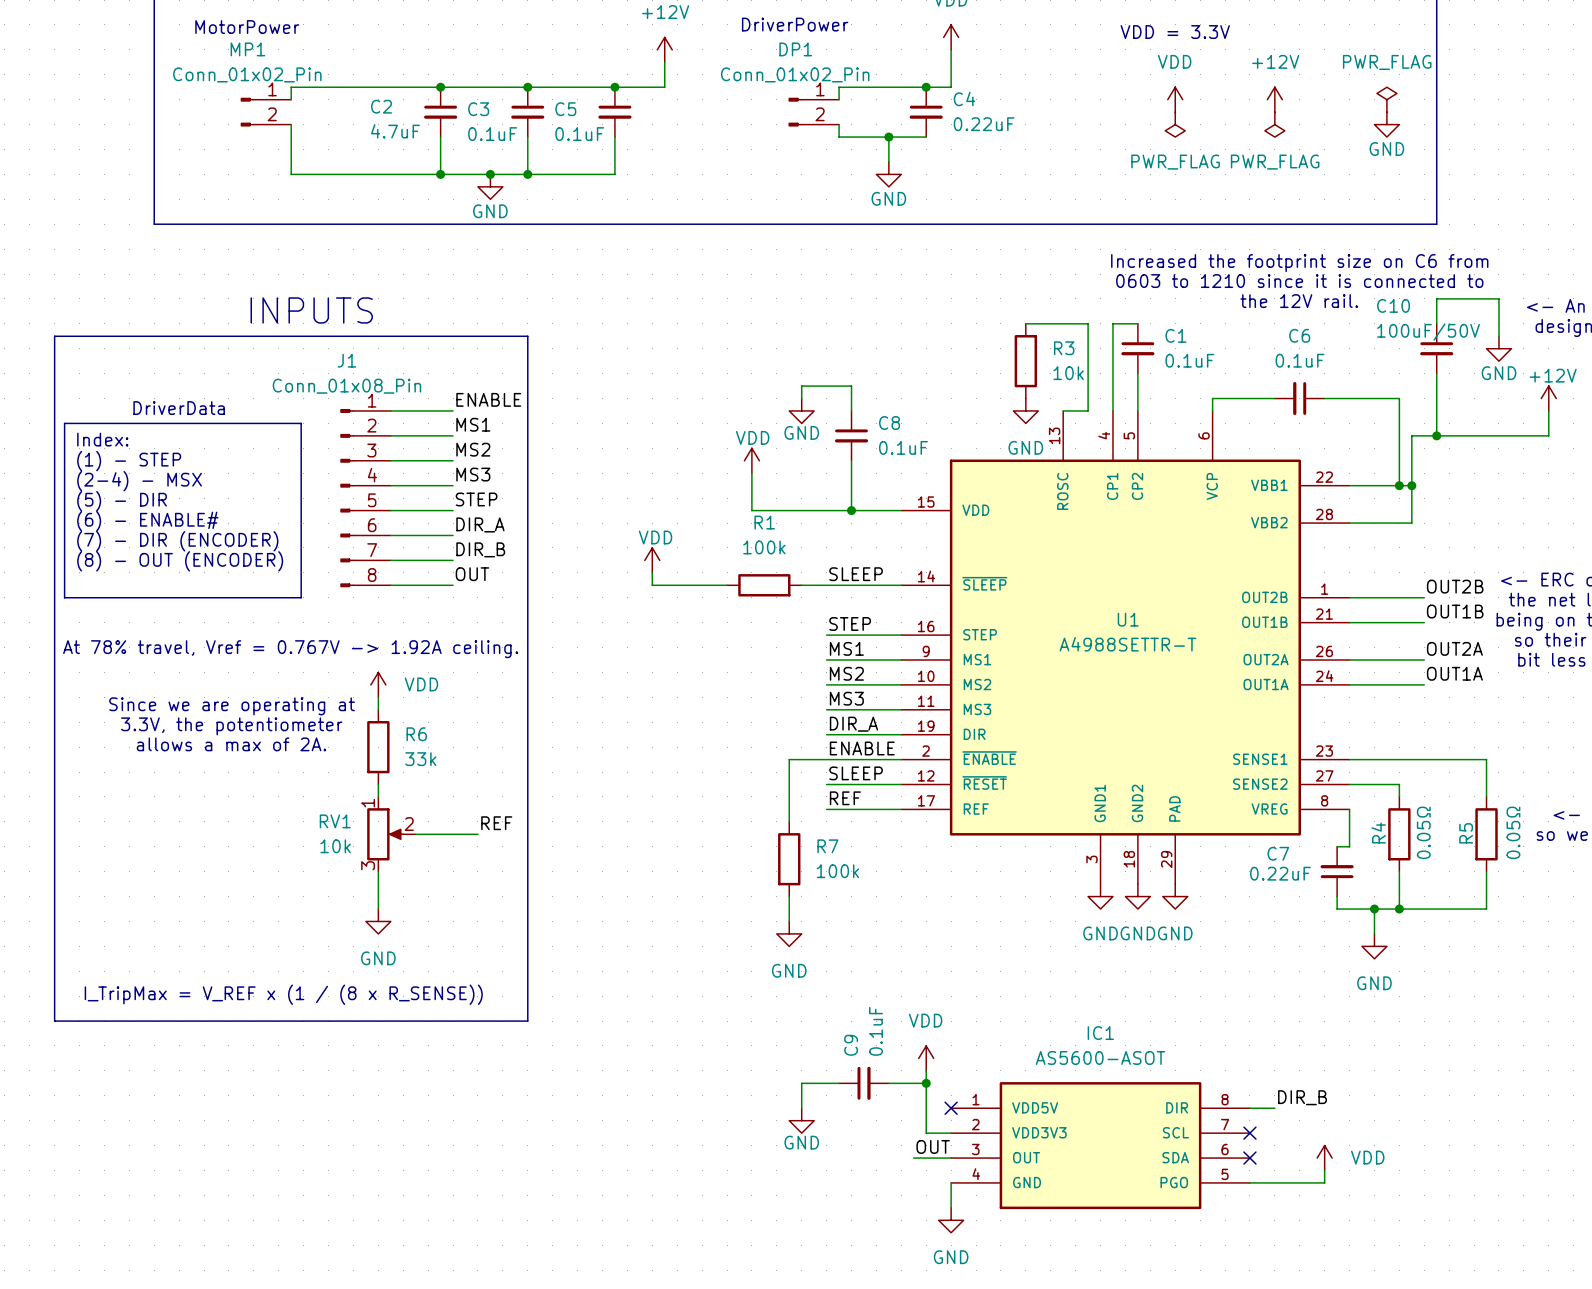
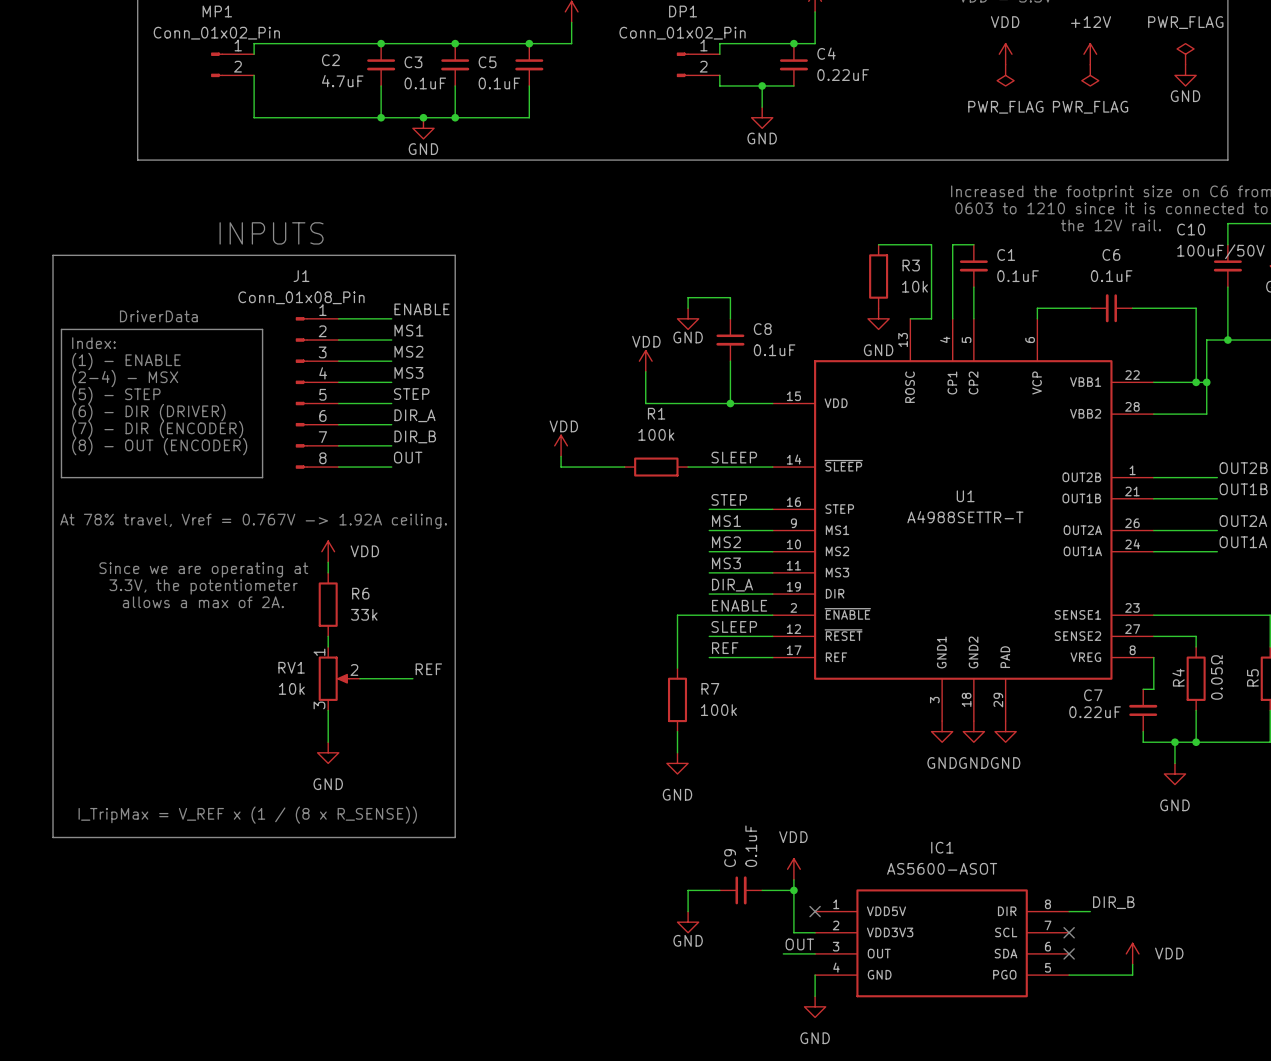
text: (1) - STEP (129, 461) -> (1) - ENABLE (126, 361)
text: (5) - DIR (122, 501) -> (5) - STEP (116, 395)
text: (6) - ENABLE# (147, 521) -> (6) - DIR (DRIVER) (148, 412)

